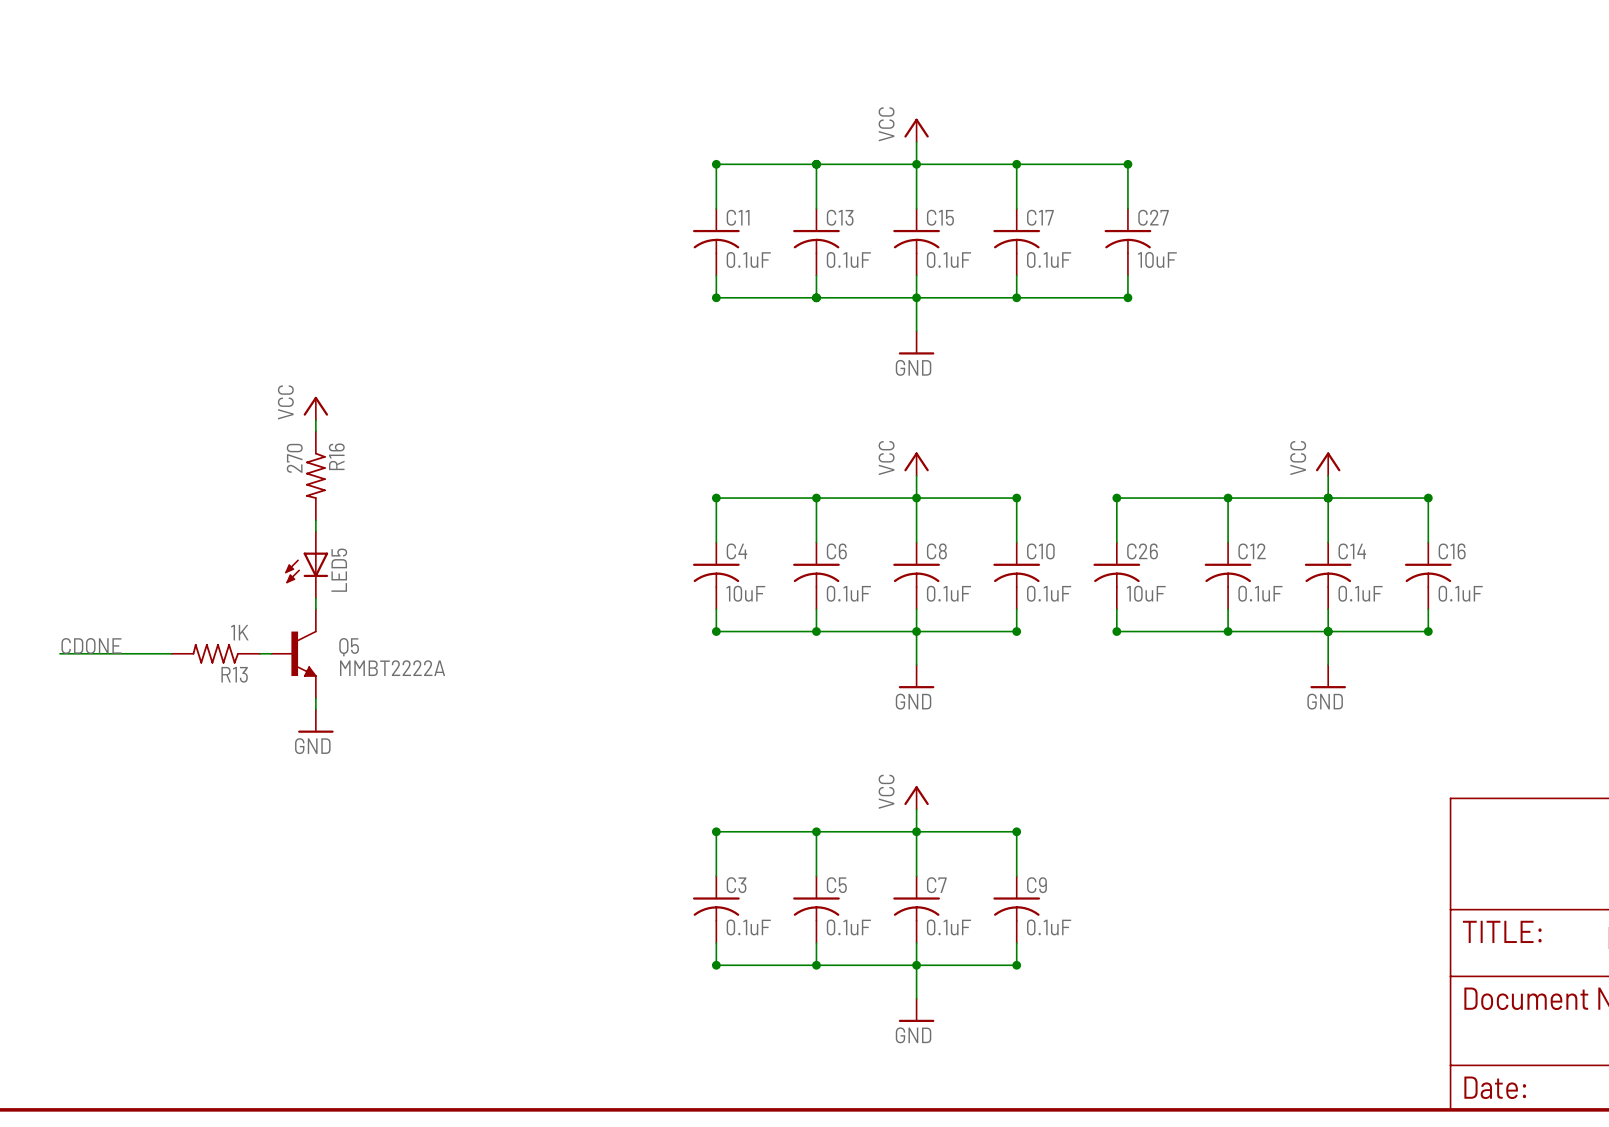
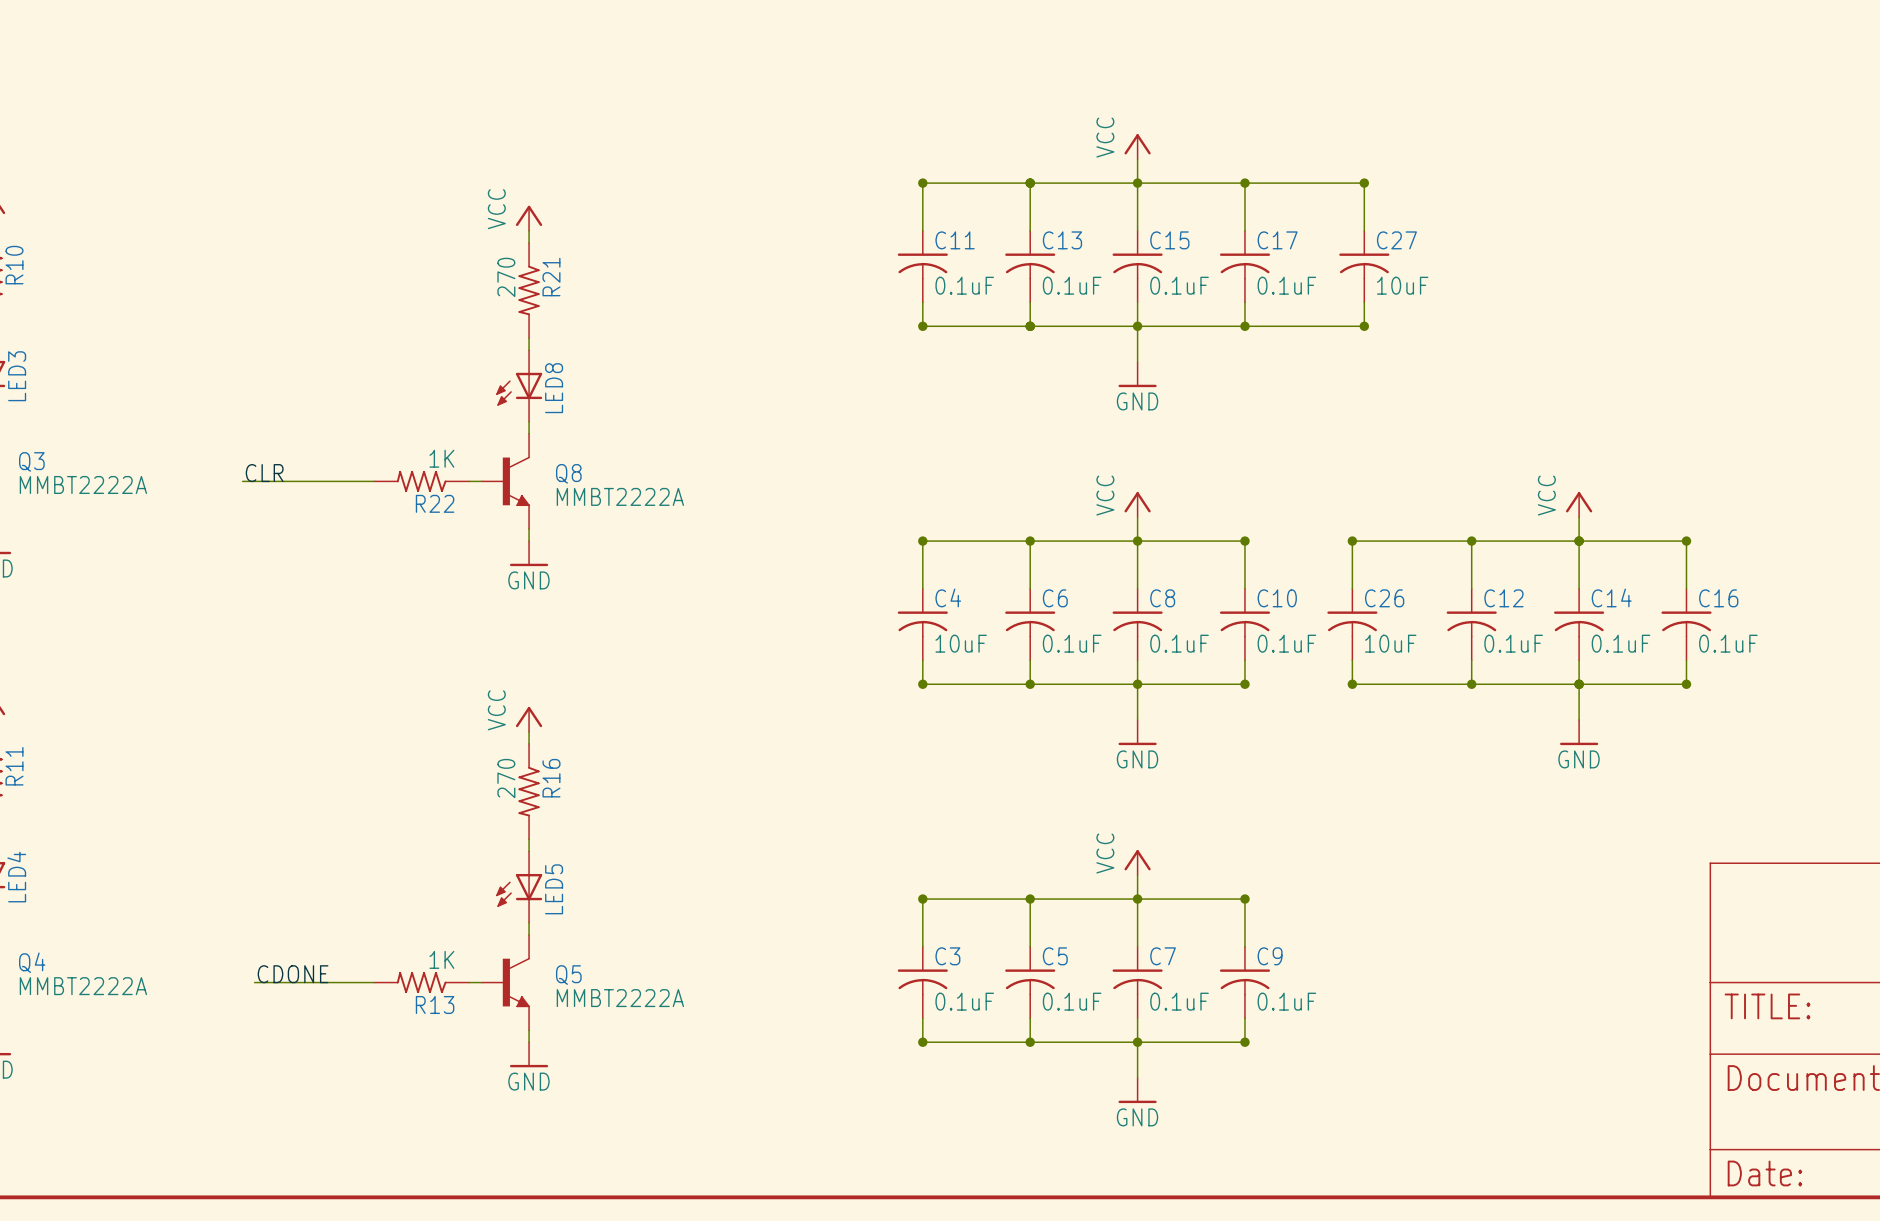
power symbol: none -> VCC (529, 218)
R21: none -> 270 (529, 290)
LED8: none -> (519, 385)
power symbol: VCC (315, 408) -> none
wire: (315, 420) (315, 431) -> (529, 230) (529, 242)
label: none -> CLR (264, 473)
wire: none -> (242, 481) (373, 481)
R22: none -> 1K (421, 481)
Q8: none -> MMBT2222A (505, 481)
R16 position: (315, 475) -> (529, 791)
power symbol: none -> GND (529, 553)
wire: (315, 520) (315, 531) -> (529, 338) (529, 350)
LED5 position: (306, 564) -> (519, 887)
wire: (315, 598) (315, 609) -> (529, 421) (529, 433)
label: CDONE (91, 646) -> none
wire: (60, 653) (171, 653) -> none
R13 position: (215, 653) -> (421, 982)
wire: (260, 653) (271, 653) -> (469, 481) (481, 481)
Q5 position: (293, 653) -> (505, 982)
power symbol: none -> VCC (529, 719)
wire: none -> (529, 731) (529, 743)
wire: (315, 698) (315, 709) -> (529, 529) (529, 541)
power symbol: GND (315, 721) -> none
wire: none -> (529, 839) (529, 851)
wire: none -> (529, 922) (529, 934)
label: none -> CDONE (293, 974)
wire: none -> (254, 982) (373, 982)
wire: none -> (469, 982) (481, 982)
wire: none -> (529, 1030) (529, 1042)
power symbol: none -> GND (529, 1054)

